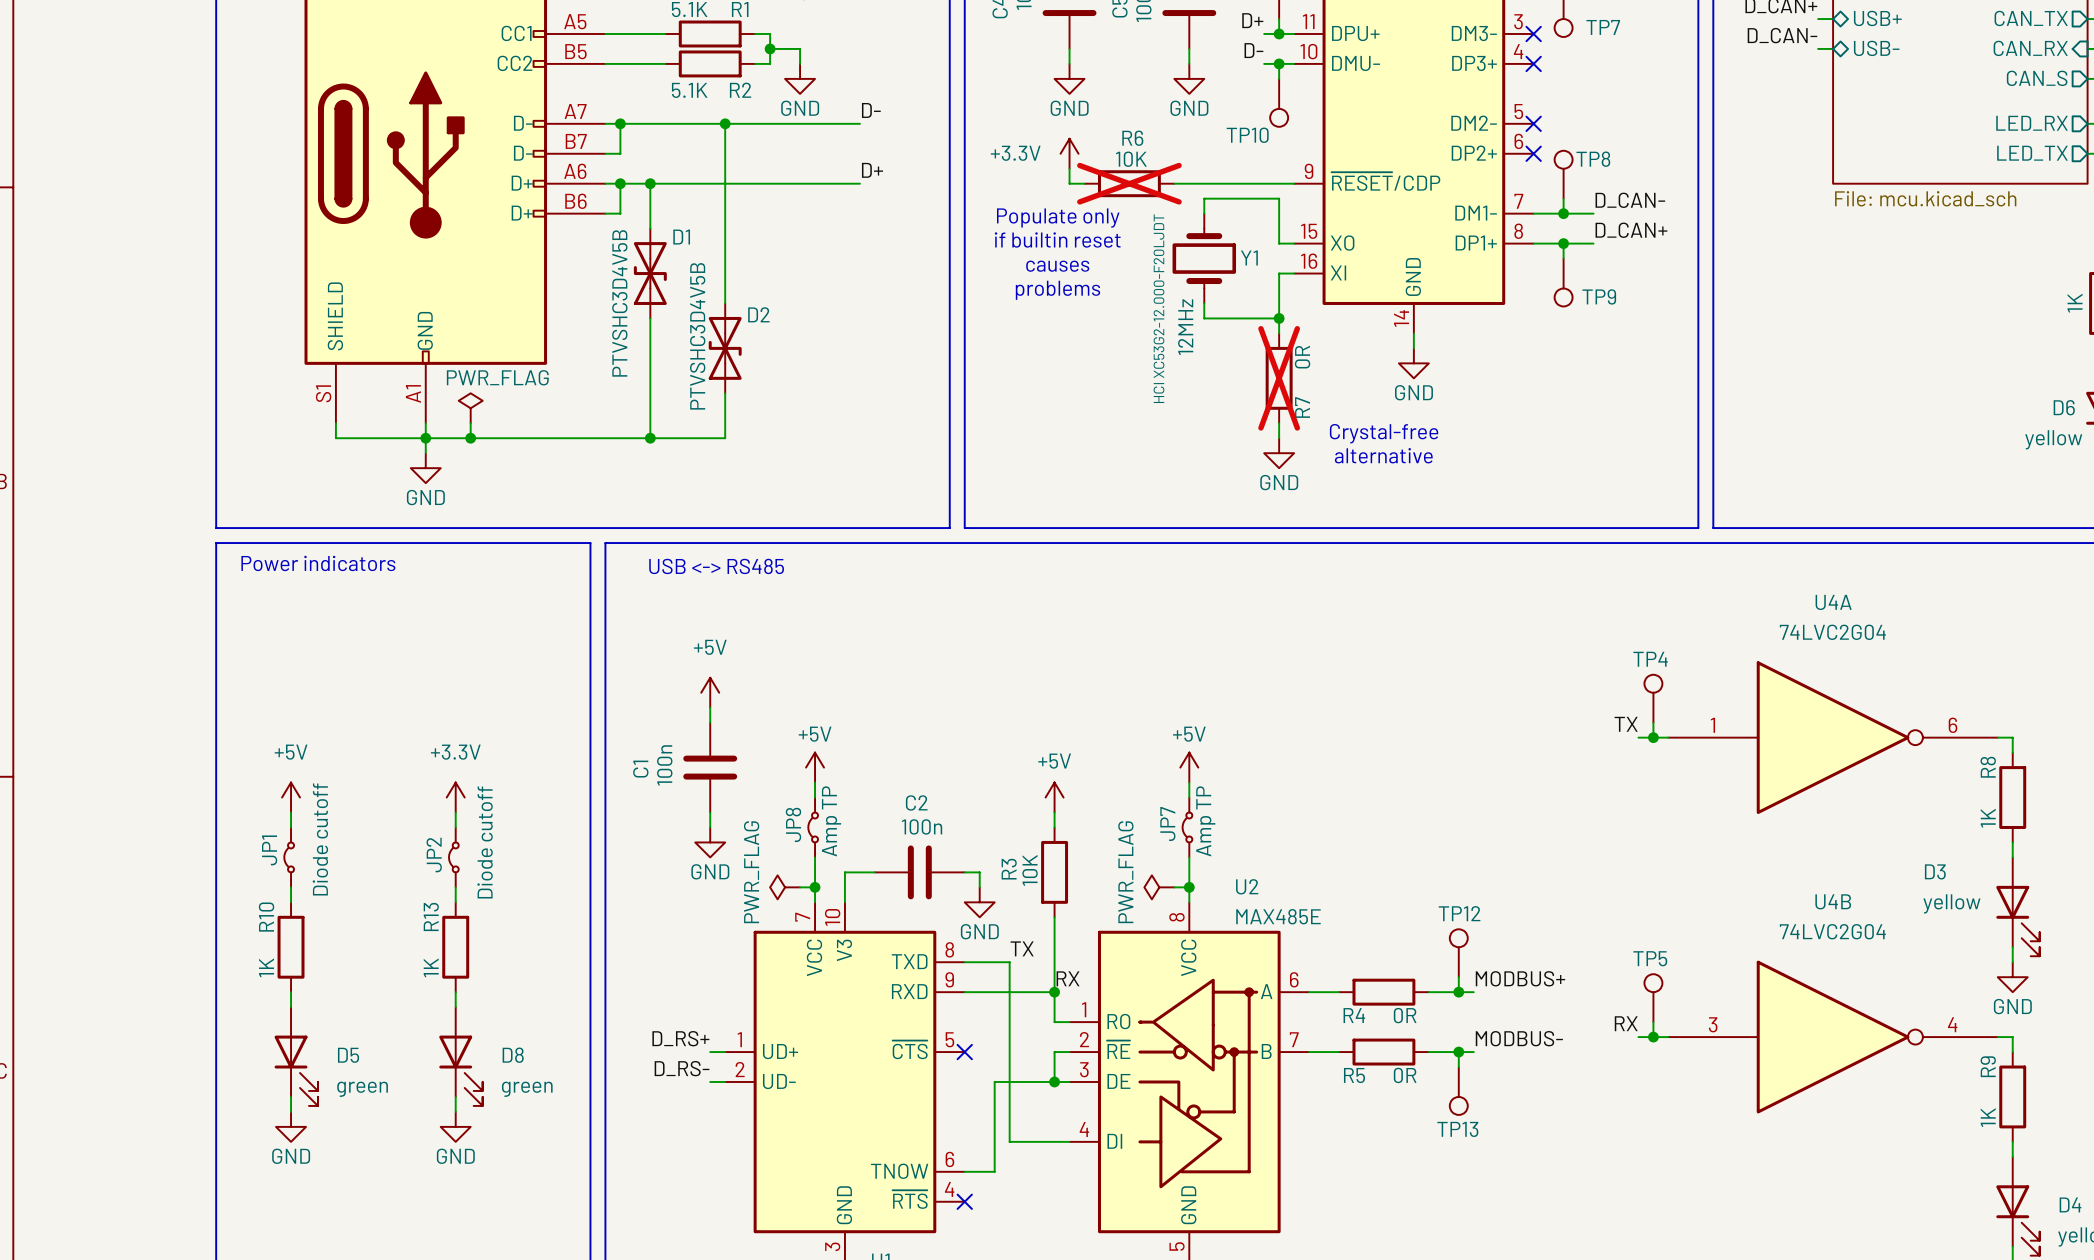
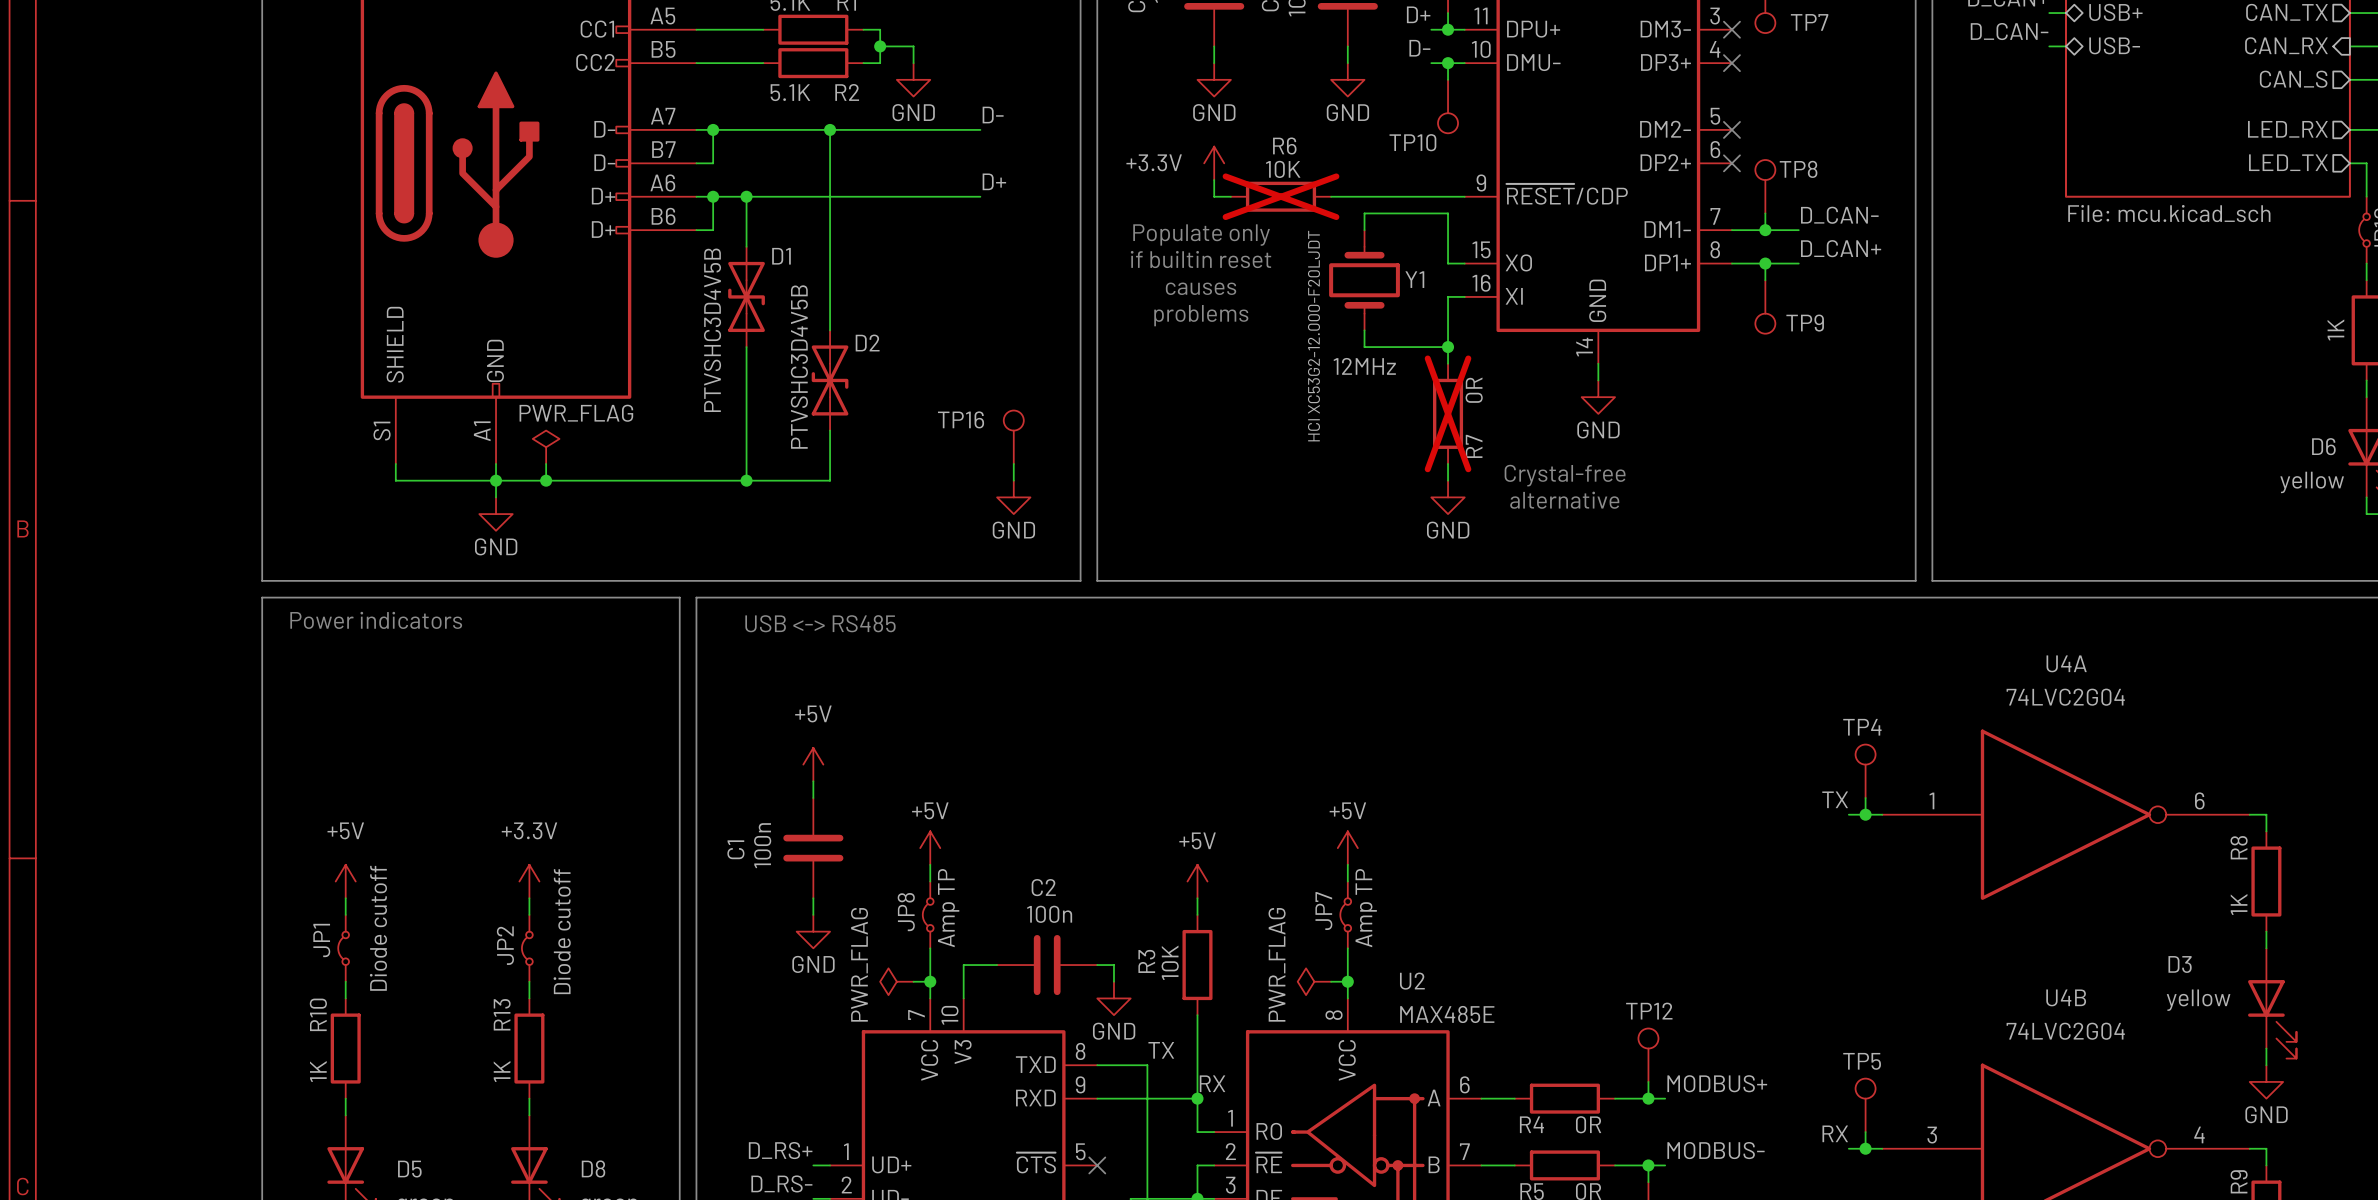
Y1 text: 12MHz (1185, 327) -> none
Y1 text: none -> 12MHz (1364, 366)
TP16: none -> (1013, 437)
wire: none -> (1013, 463) (1013, 480)
power symbol: none -> GND (1013, 497)

